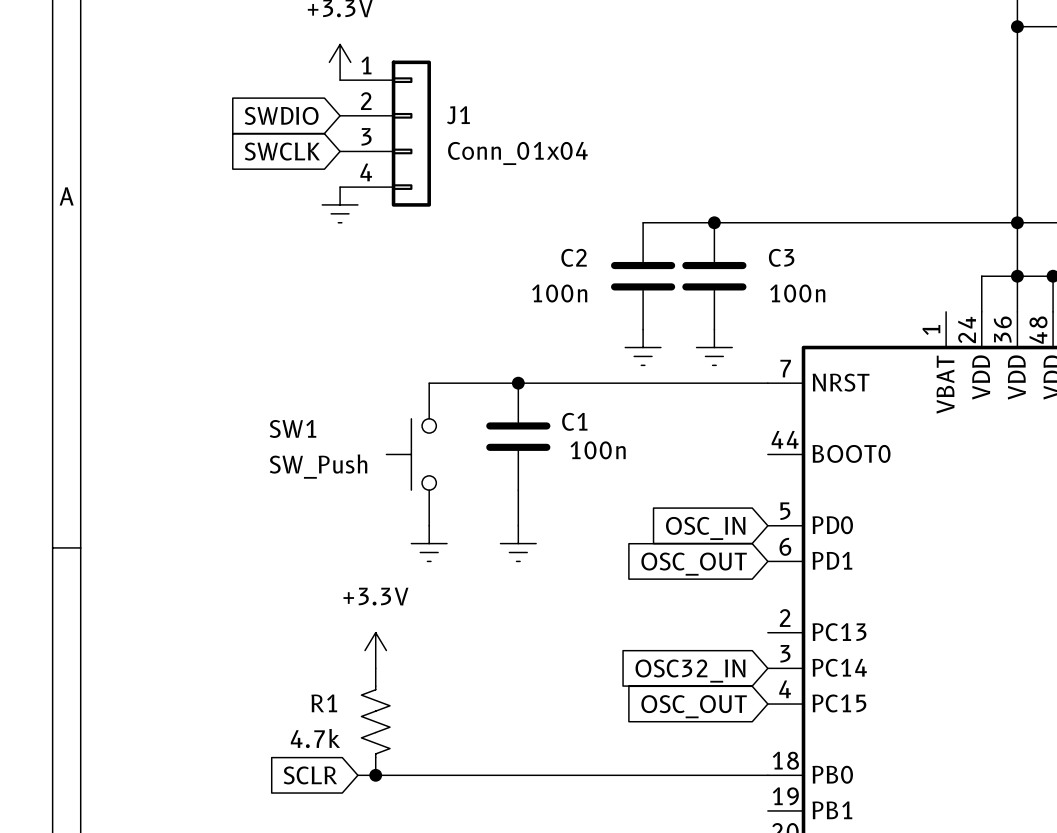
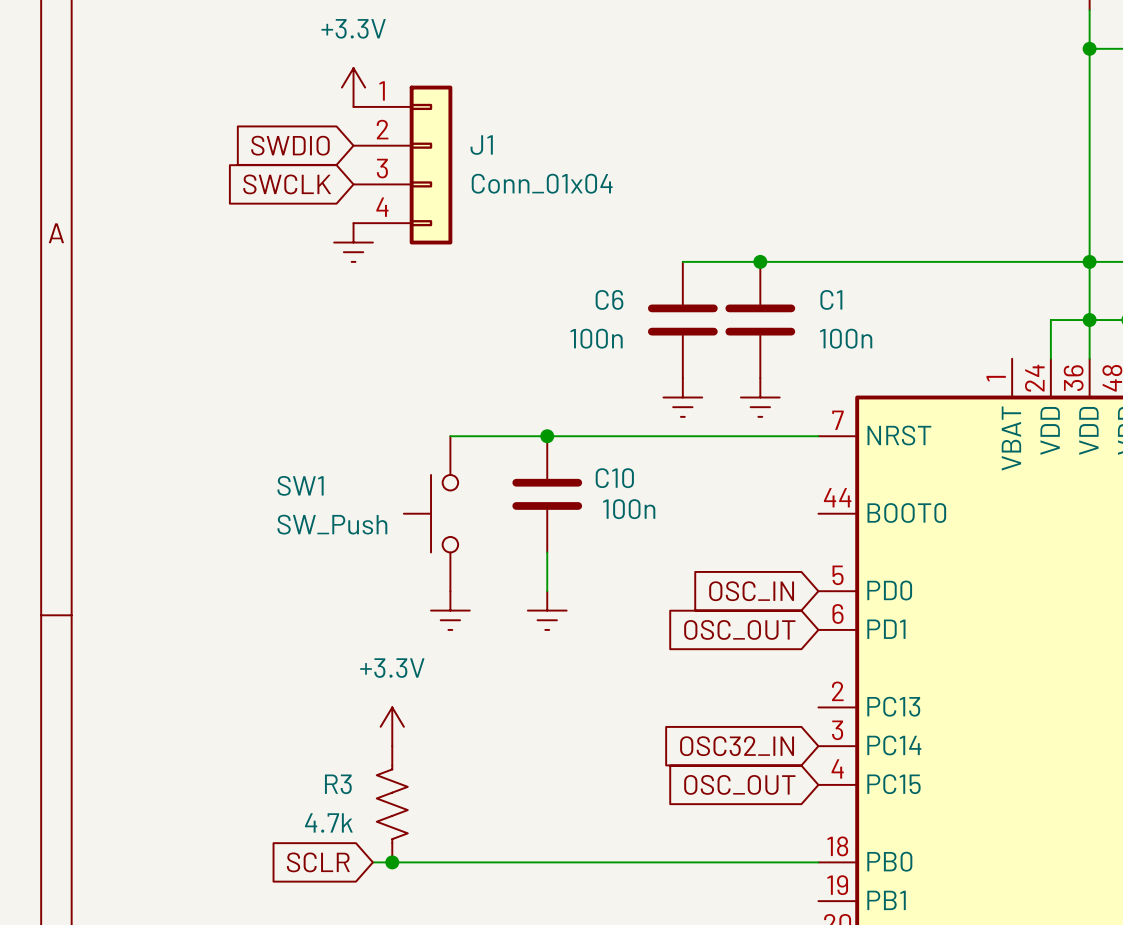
C2 name: C2 (574, 257) -> C6 (609, 299)
C3 name: C3 (781, 257) -> C1 (831, 299)
C1 name: C1 (574, 421) -> C10 (614, 478)
R1 name: R1 (324, 703) -> R3 (338, 784)

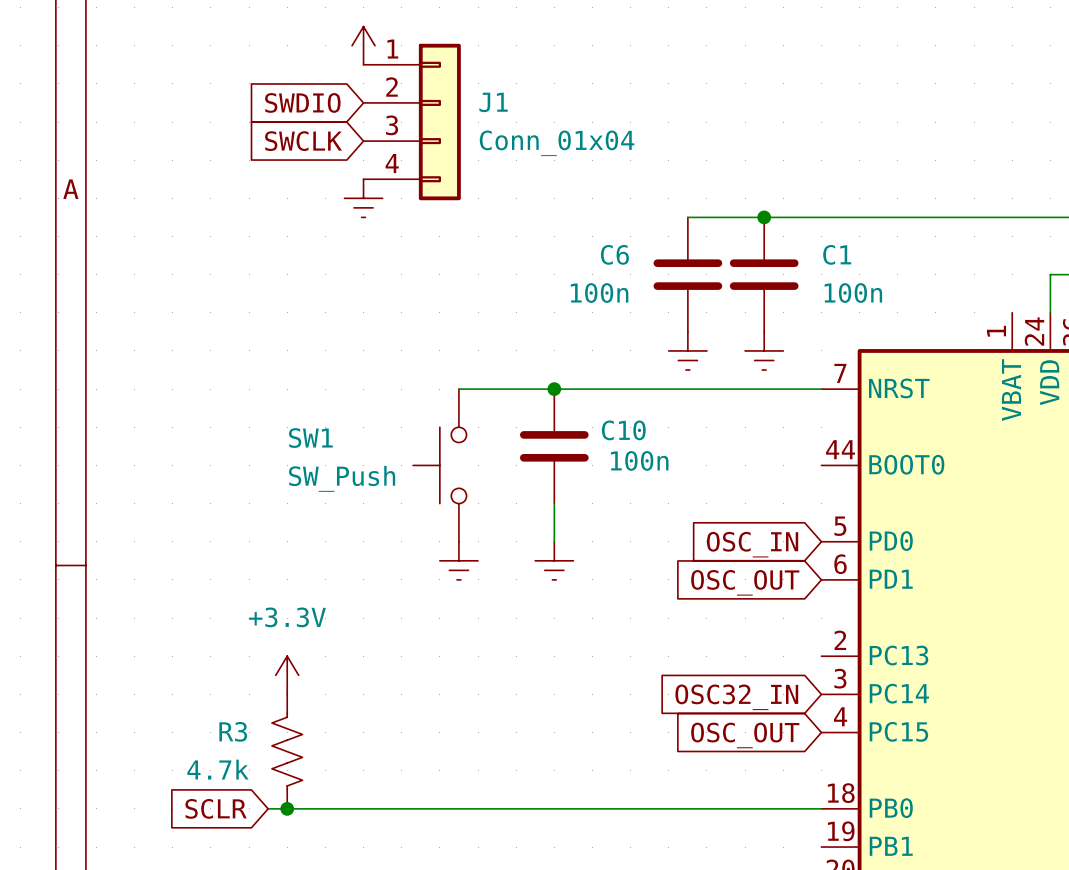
power symbol position: +3.3V (392, 726) -> +3.3V (287, 675)
R3 position: (392, 804) -> (287, 751)
wire: none -> (268, 808) (382, 808)
junction: none -> (287, 808)
global label position: SCLR (318, 862) -> SCLR (216, 808)
junction: (392, 862) -> none

